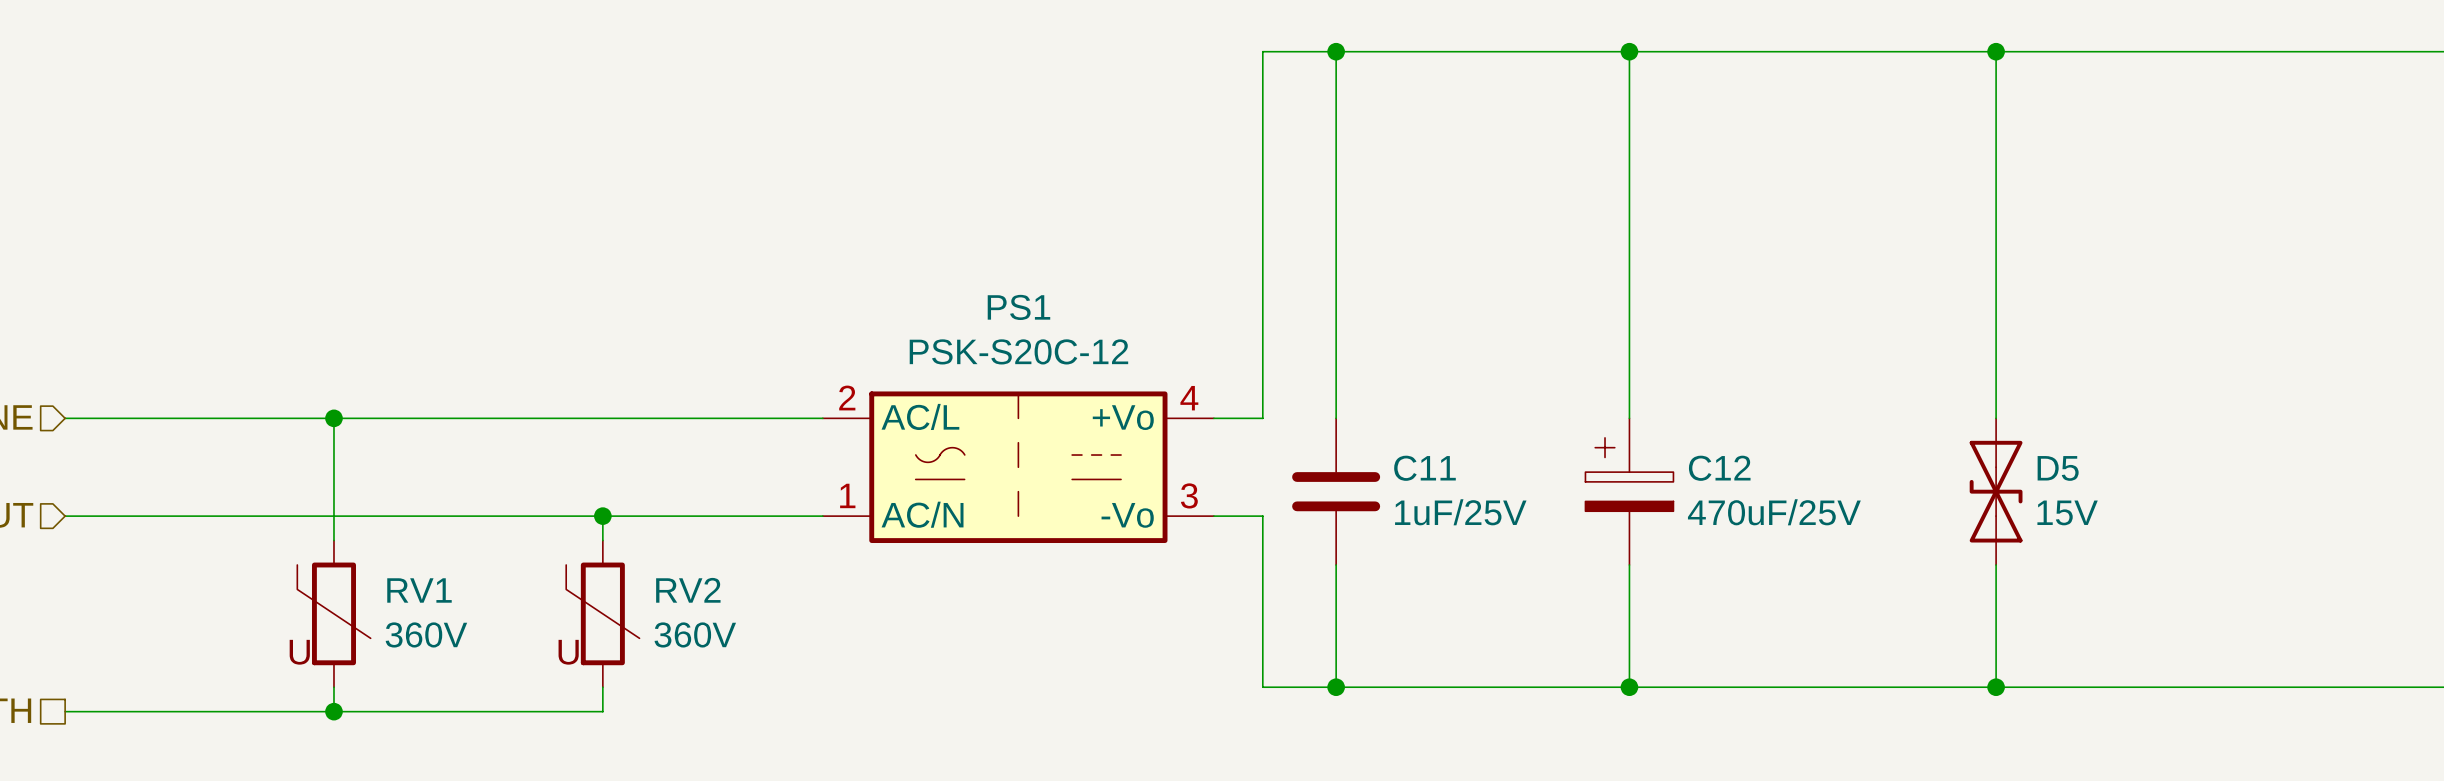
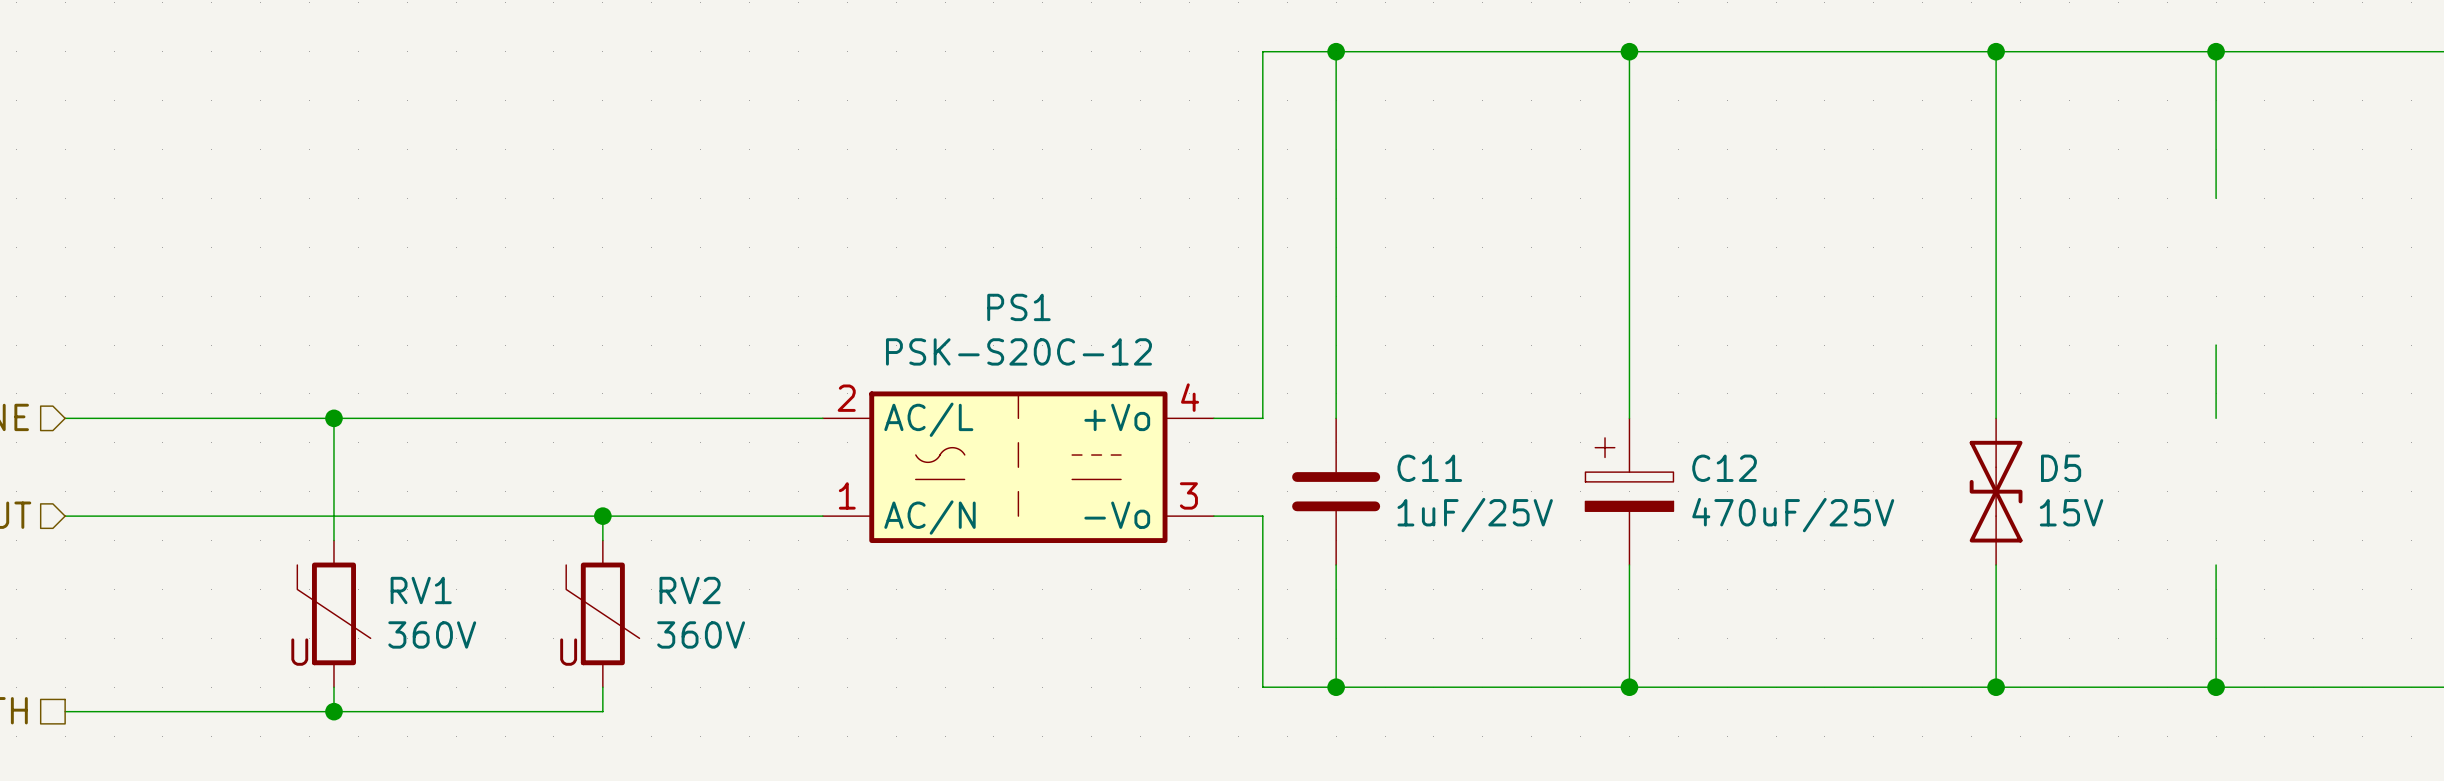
wire: none -> (2216, 51) (2216, 198)
junction: none -> (2216, 51)
wire: none -> (2216, 345) (2216, 418)
wire: none -> (2216, 565) (2216, 687)
junction: none -> (2216, 687)

